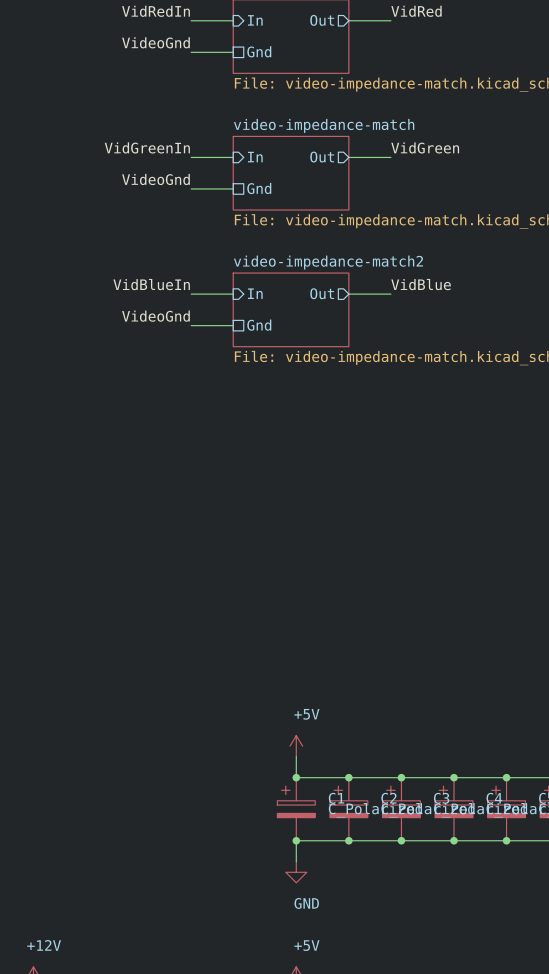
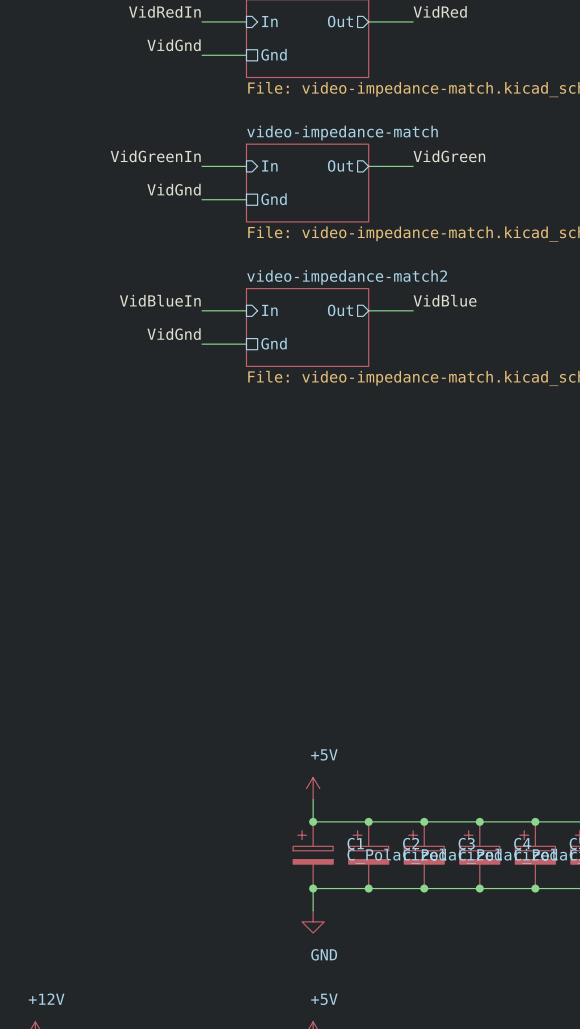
label: VideoGnd (155, 42) -> VidGnd (174, 45)
label: VideoGnd (155, 179) -> VidGnd (174, 189)
label: VideoGnd (155, 316) -> VidGnd (174, 334)

